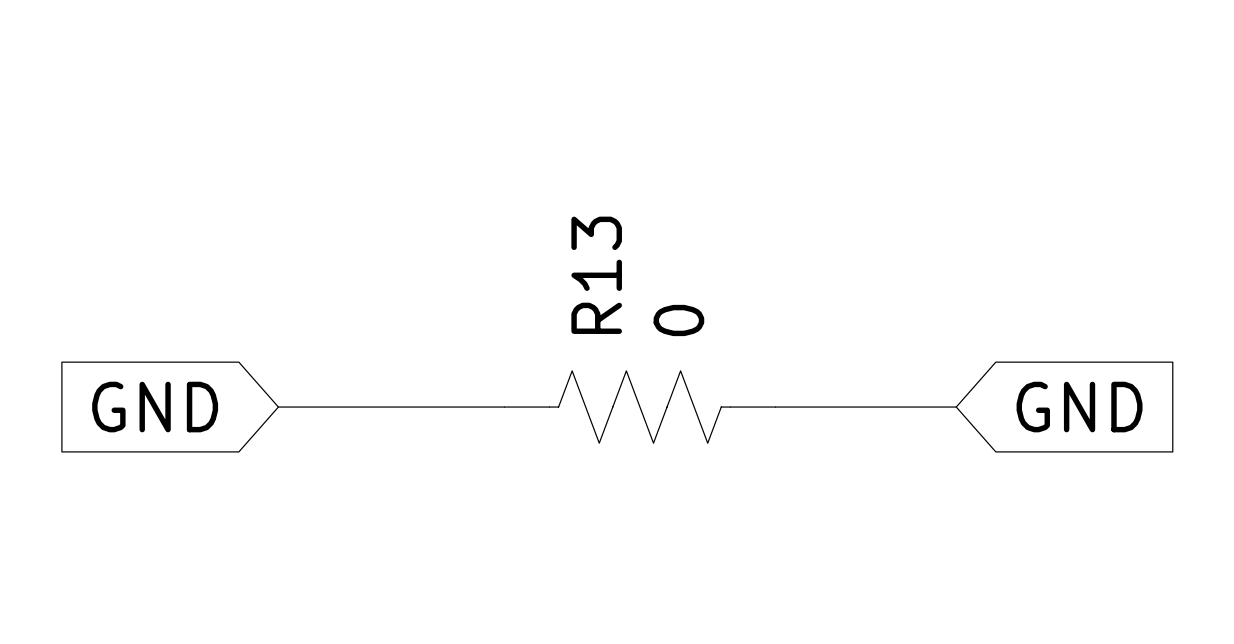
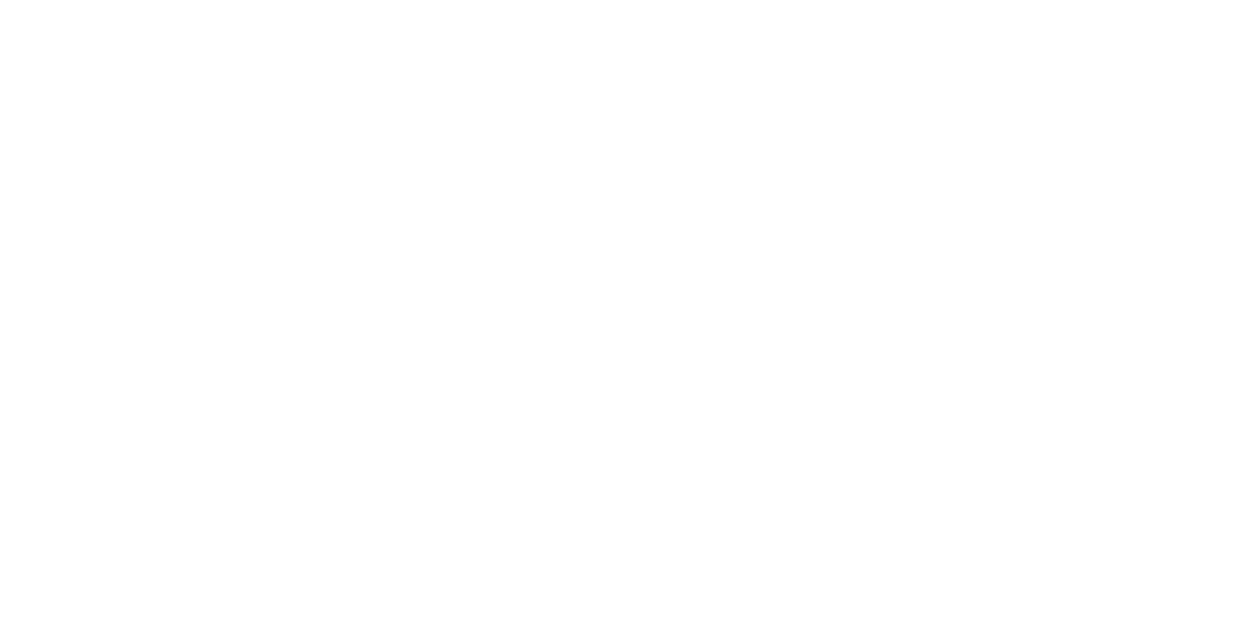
global label: GND (155, 407) -> none
wire: (278, 407) (504, 407) -> none
R13: 0 (639, 407) -> none
wire: (775, 407) (956, 407) -> none
global label: GND (1079, 407) -> none

